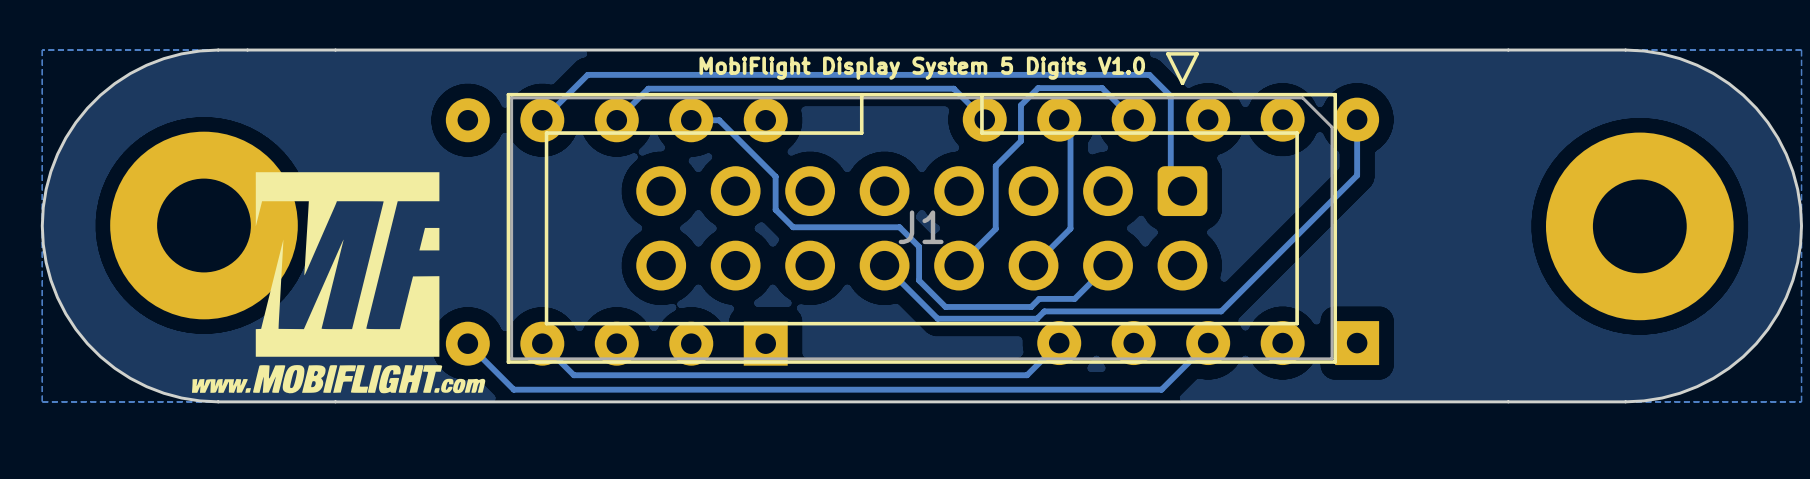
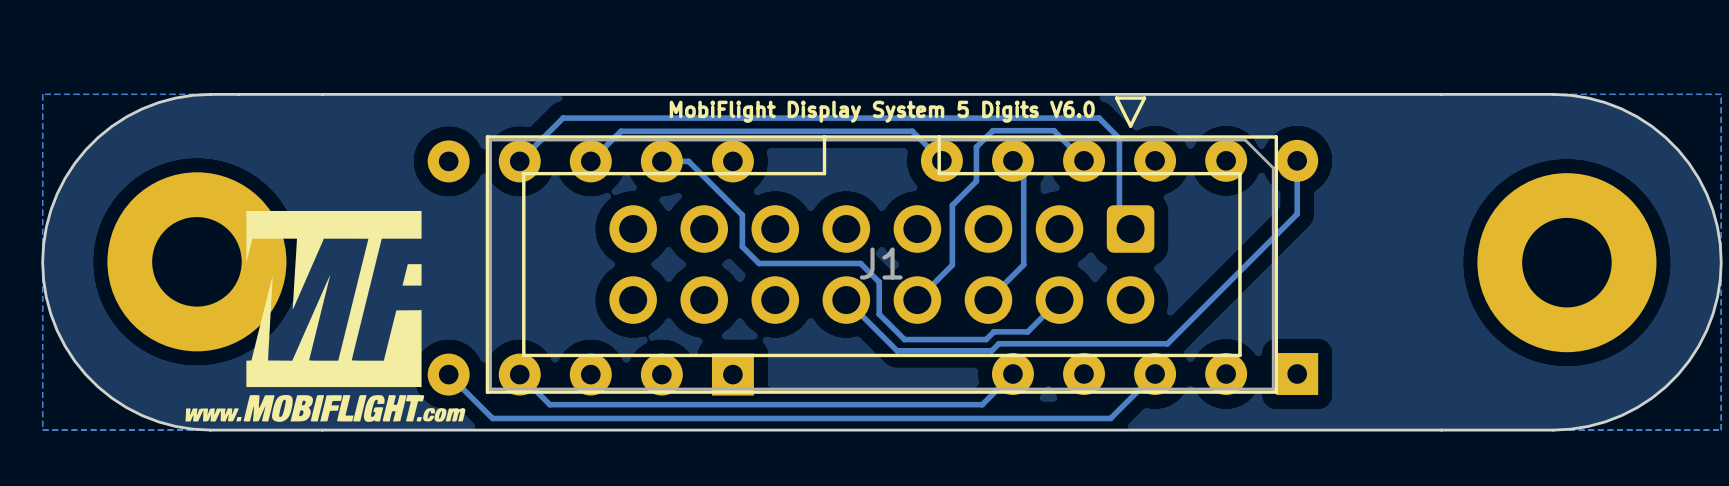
text: MobiFlight Display System 5 Digits V1.0 (922, 68) -> MobiFlight Display System 5 Digits V6.0 (882, 111)

